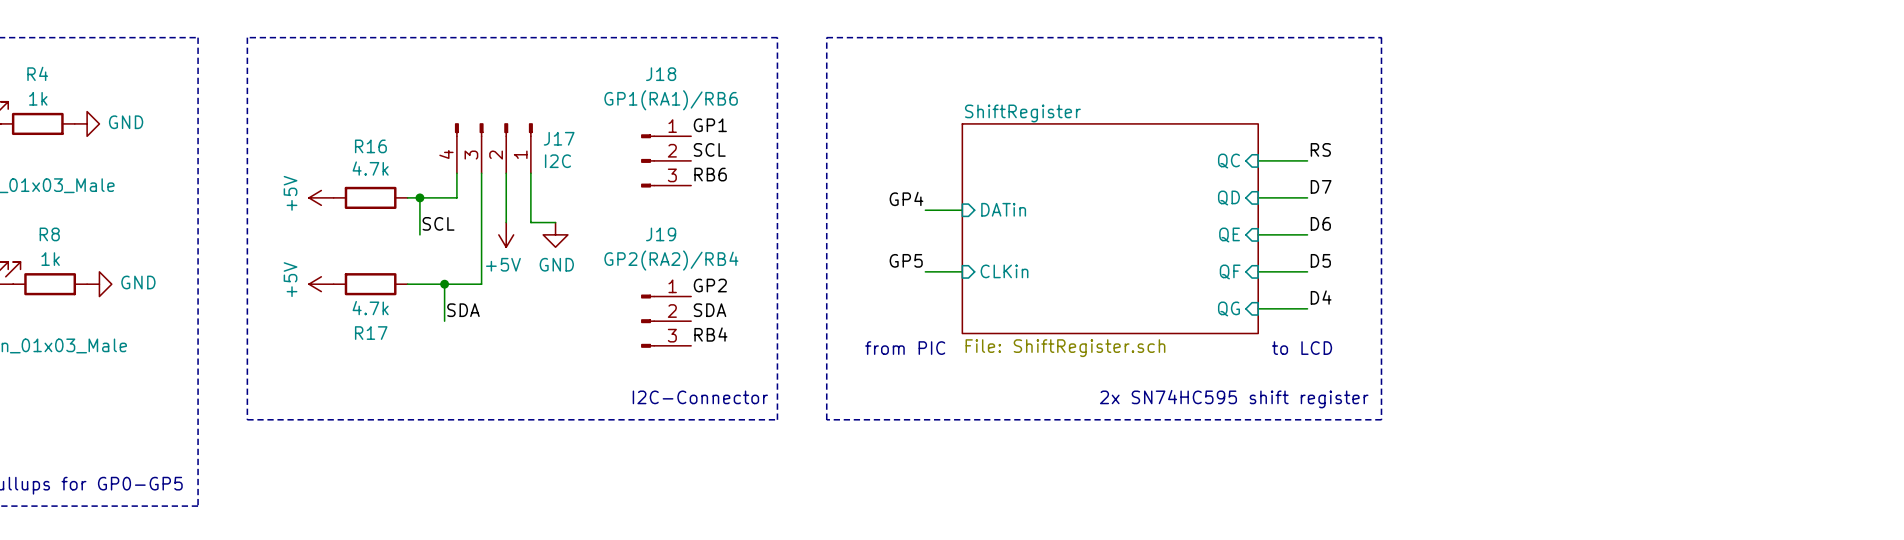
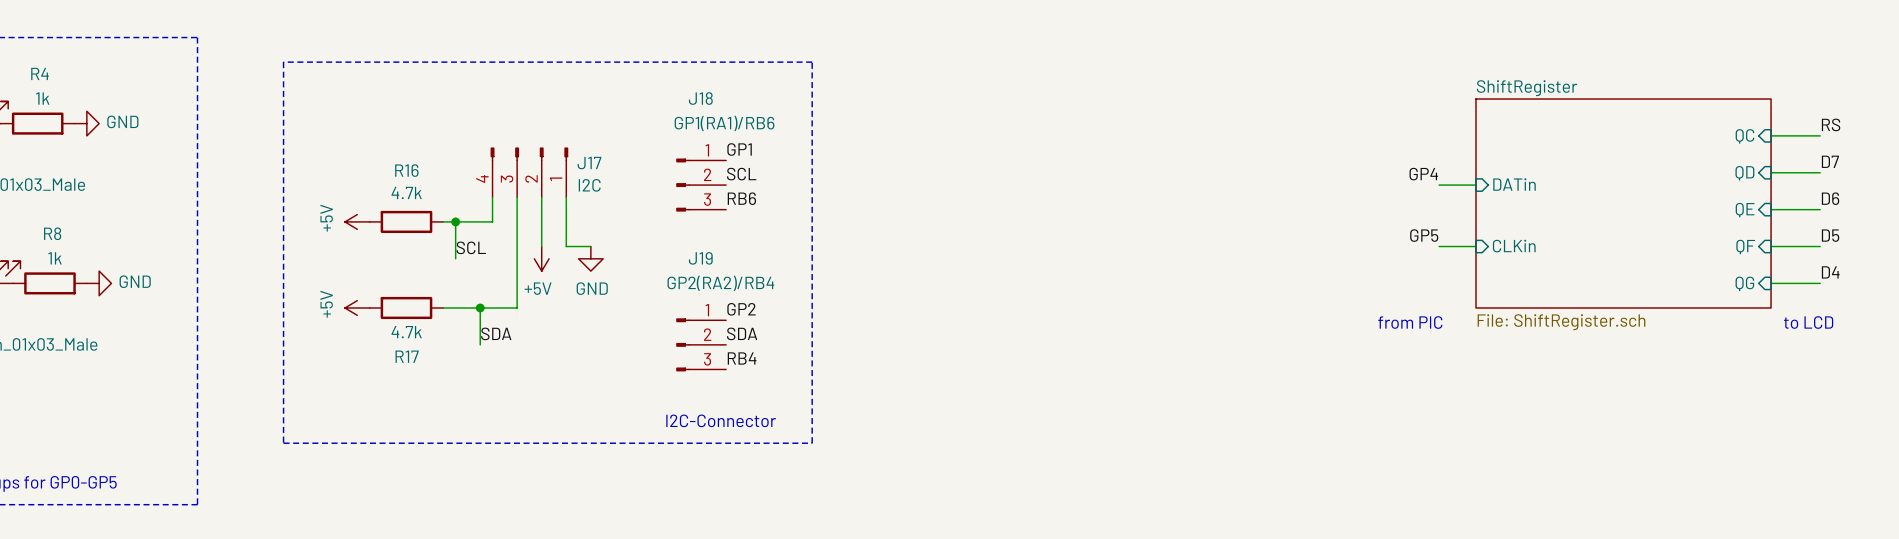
line: (247, 37) (777, 37) (777, 419) (247, 419) (247, 37) -> (283, 62) (812, 62) (812, 443) (283, 443) (283, 62)
line: (826, 37) (1381, 37) (1381, 419) (826, 419) (826, 37) -> none
label position: GP1 (710, 125) -> GP1 (739, 149)
label: none -> RS (1831, 124)
sheet pin: none -> QC (1744, 136)
wire: none -> (1771, 135) (1820, 135)
J17 position: (493, 148) -> (529, 172)
label position: SCL (709, 149) -> SCL (741, 174)
label: RS (1320, 149) -> none
J18 position: (666, 160) -> (701, 185)
wire: (1258, 160) (1307, 160) -> none
sheet pin: QC (1228, 161) -> none
label: none -> D7 (1830, 161)
wire: (456, 173) (456, 197) (407, 197) -> (492, 197) (492, 221) (443, 221)
wire: (481, 173) (481, 284) (407, 284) -> (517, 197) (517, 307) (443, 307)
wire: (506, 173) (506, 222) -> (541, 197) (541, 246)
wire: (530, 173) (530, 222) (555, 222) -> (566, 197) (566, 246) (590, 246)
sheet pin: none -> QD (1744, 173)
wire: none -> (1771, 172) (1820, 172)
label position: RB6 (710, 174) -> RB6 (741, 198)
label: none -> GP4 (1423, 174)
wire: none -> (1439, 185) (1475, 185)
sheet pin: none -> DATin (1514, 184)
label: D7 (1321, 186) -> none
power symbol: +5V (321, 197) -> none
R16 position: (370, 197) -> (406, 221)
wire: (419, 197) (419, 234) -> (455, 221) (455, 258)
junction: (419, 197) -> none
wire: (1258, 197) (1307, 197) -> none
label: GP4 (906, 198) -> none
sheet pin: QD (1228, 198) -> none
label: none -> D6 (1830, 198)
sheet ShiftRegister: none -> File: ShiftRegister.sch (1623, 203)
sheet pin: DATin (1003, 209) -> none
wire: (925, 210) (962, 210) -> none
sheet pin: none -> QE (1745, 210)
wire: none -> (1771, 209) (1820, 209)
power symbol: none -> +5V (357, 221)
junction: none -> (455, 221)
label position: SCL (438, 223) -> SCL (471, 247)
label: D6 (1320, 223) -> none
sheet ShiftRegister: File: ShiftRegister.sch (1110, 228) -> none
power symbol position: +5V (506, 234) -> +5V (541, 258)
power symbol position: GND (555, 234) -> GND (590, 258)
wire: (1258, 234) (1307, 234) -> none
sheet pin: QE (1229, 235) -> none
label: none -> GP5 (1424, 235)
label: none -> D5 (1830, 235)
sheet pin: none -> CLKin (1514, 246)
wire: none -> (1439, 246) (1475, 246)
sheet pin: none -> QF (1745, 247)
wire: none -> (1771, 246) (1820, 246)
label: GP5 (906, 260) -> none
label: D5 (1320, 260) -> none
wire: (925, 271) (962, 271) -> none
sheet pin: CLKin (1004, 271) -> none
sheet pin: QF (1230, 271) -> none
wire: (1258, 271) (1307, 271) -> none
label: none -> D4 (1830, 272)
power symbol: +5V (321, 284) -> none
R17 position: (370, 284) -> (406, 307)
wire: (444, 284) (444, 321) -> (480, 307) (480, 344)
junction: (444, 284) -> none
sheet pin: none -> QG (1744, 283)
wire: none -> (1771, 283) (1820, 283)
label position: GP2 (710, 285) -> GP2 (741, 309)
label: D4 (1321, 297) -> none
power symbol: none -> +5V (357, 307)
junction: none -> (480, 307)
sheet pin: QG (1228, 308) -> none
wire: (1258, 308) (1307, 308) -> none
label position: SDA (463, 310) -> SDA (496, 333)
label position: SDA (710, 310) -> SDA (742, 333)
J19 position: (666, 321) -> (701, 344)
text: none -> from PIC (1410, 322)
text: none -> to LCD (1808, 322)
label position: RB4 (710, 334) -> RB4 (742, 358)
text: from PIC (905, 348) -> none
text: to LCD (1302, 348) -> none
text position: I2C-Connector (700, 397) -> I2C-Connector (721, 420)
text: 2x SN74HC595 shift register (1234, 399) -> none

